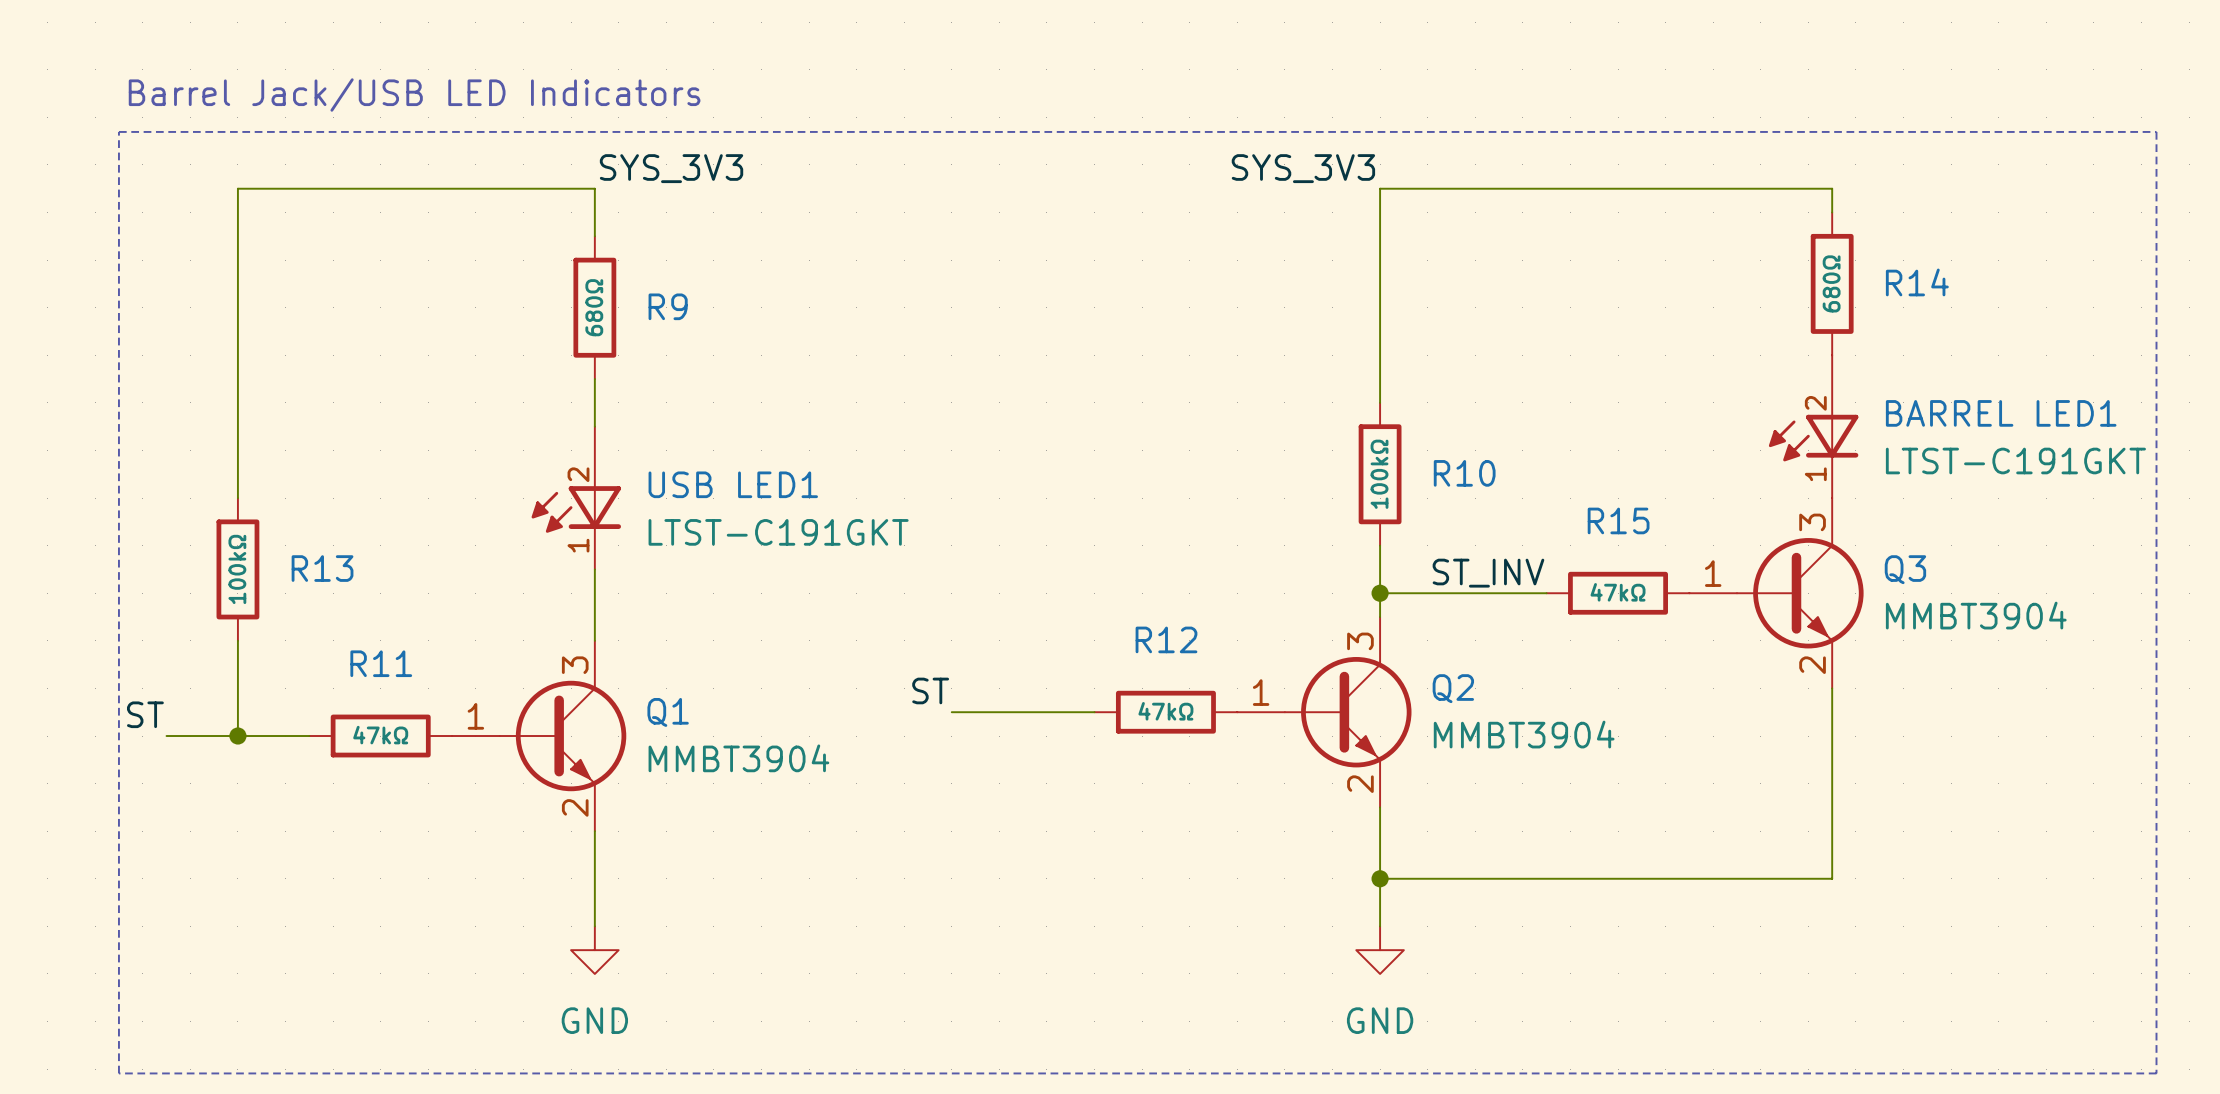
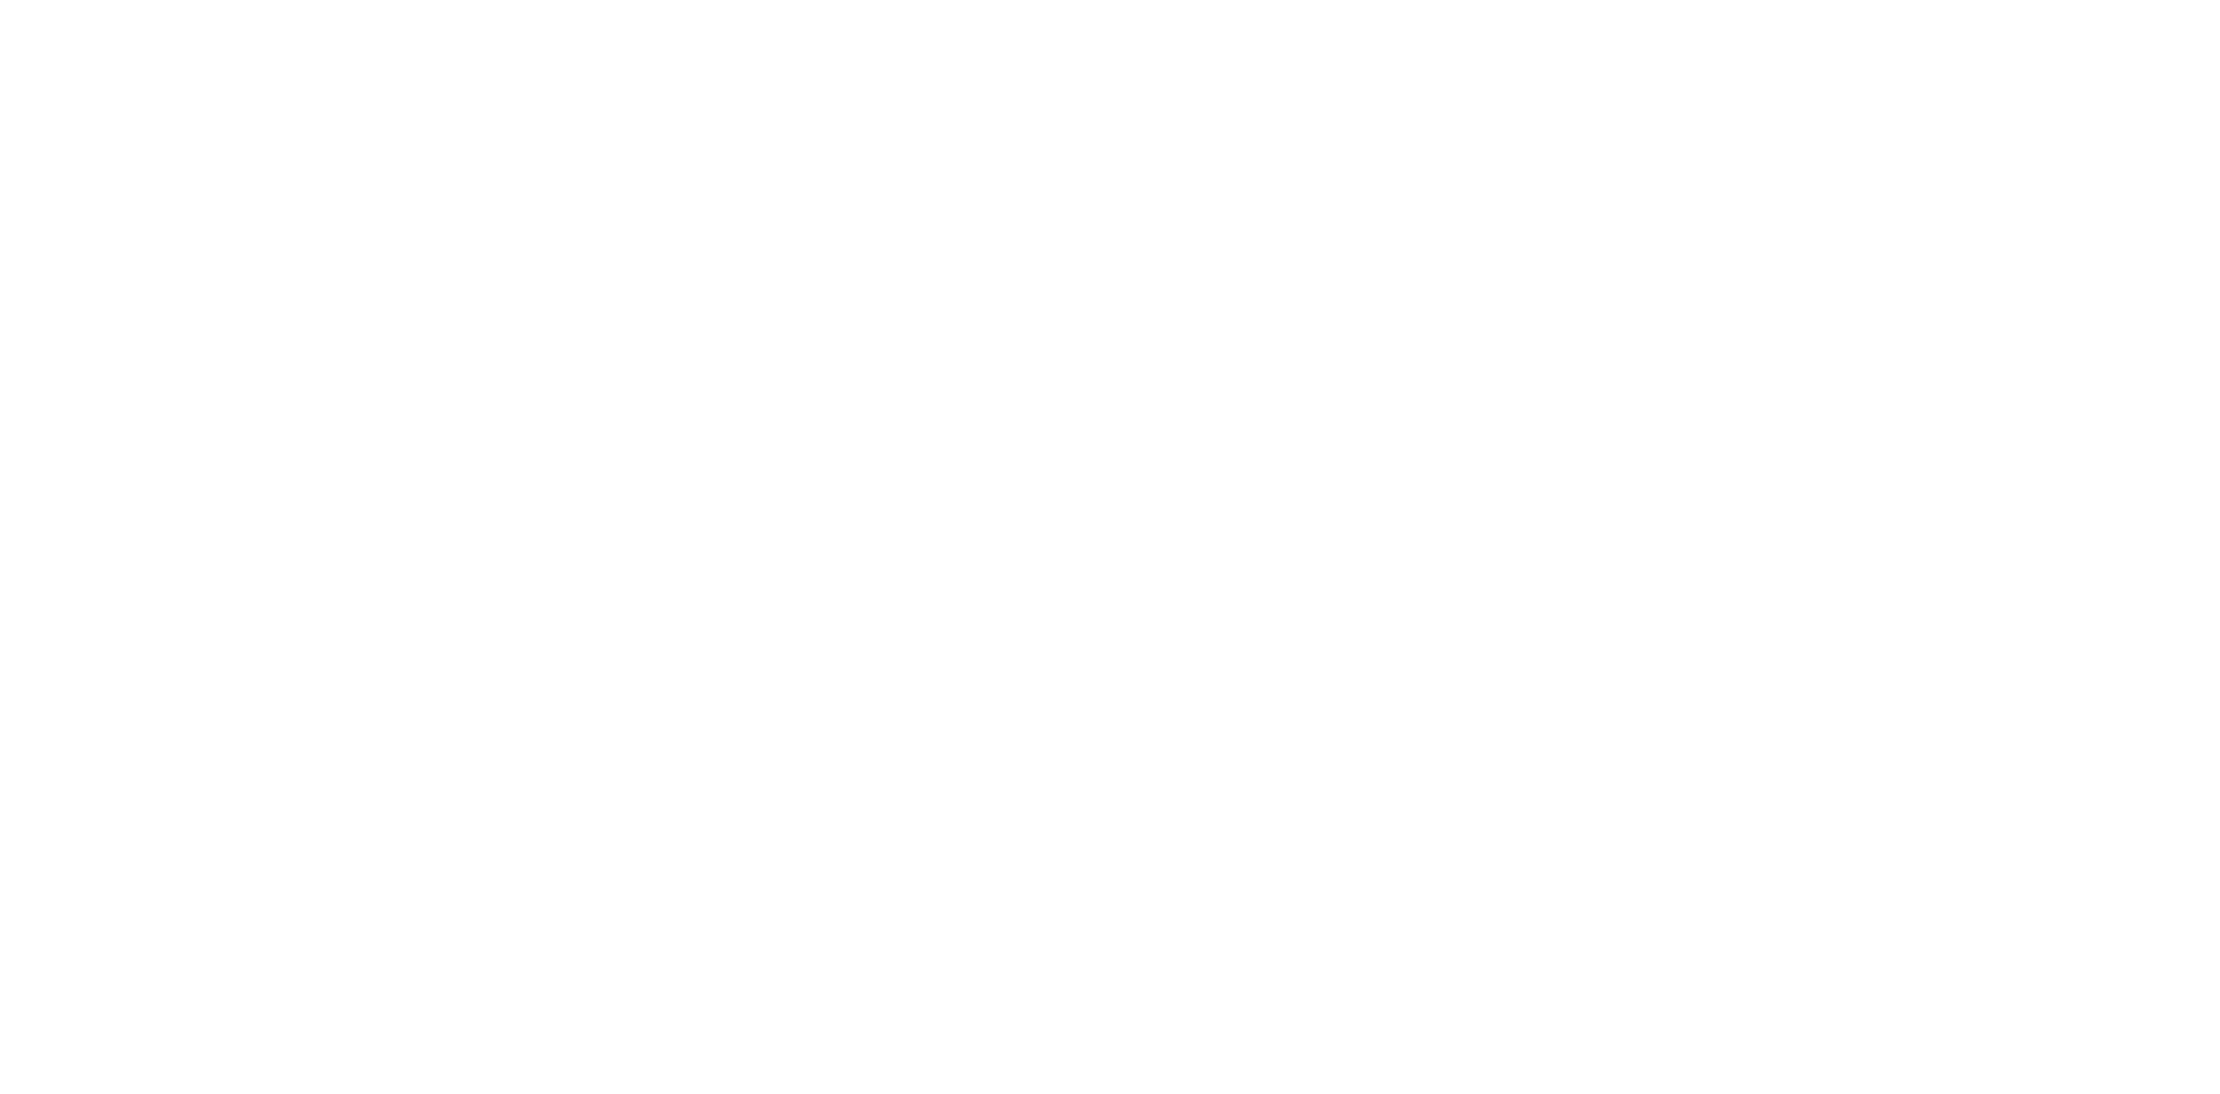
text: Barrel Jack/USB LED Indicators (414, 95) -> none
line: (118, 131) (2156, 131) (2156, 1073) (118, 1073) (118, 131) -> none
label: SYS_3V3 (671, 168) -> none
label: SYS_3V3 (1303, 168) -> none
wire: (1832, 212) (1832, 188) (1380, 188) (1380, 402) -> none
wire: (594, 236) (594, 188) (237, 188) (237, 498) -> none
R14: 680Ω (1832, 283) -> none
R9: 680Ω (594, 307) -> none
wire: (594, 379) (594, 426) -> none
BARREL LED1: LTST-C191GKT (1813, 426) -> none
R10: 100kΩ (1380, 474) -> none
USB LED1: LTST-C191GKT (576, 498) -> none
wire: (1380, 545) (1380, 617) -> none
R13: 100kΩ (237, 569) -> none
wire: (594, 569) (594, 640) -> none
label: ST_INV (1488, 573) -> none
wire: (1380, 593) (1546, 593) -> none
junction: (1380, 593) -> none
R15: 47kΩ (1618, 593) -> none
Q3: MMBT3904 (1776, 593) -> none
wire: (237, 640) (237, 736) -> none
wire: (1832, 688) (1832, 878) (1380, 878) -> none
label: ST (930, 690) -> none
wire: (951, 712) (1094, 712) -> none
R12: 47kΩ (1165, 712) -> none
Q2: MMBT3904 (1324, 712) -> none
label: ST (145, 714) -> none
wire: (166, 736) (309, 736) -> none
junction: (237, 736) -> none
R11: 47kΩ (380, 736) -> none
Q1: MMBT3904 (539, 736) -> none
wire: (1380, 807) (1380, 926) -> none
wire: (594, 831) (594, 926) -> none
junction: (1380, 878) -> none
power symbol: GND (594, 950) -> none
power symbol: GND (1380, 950) -> none

